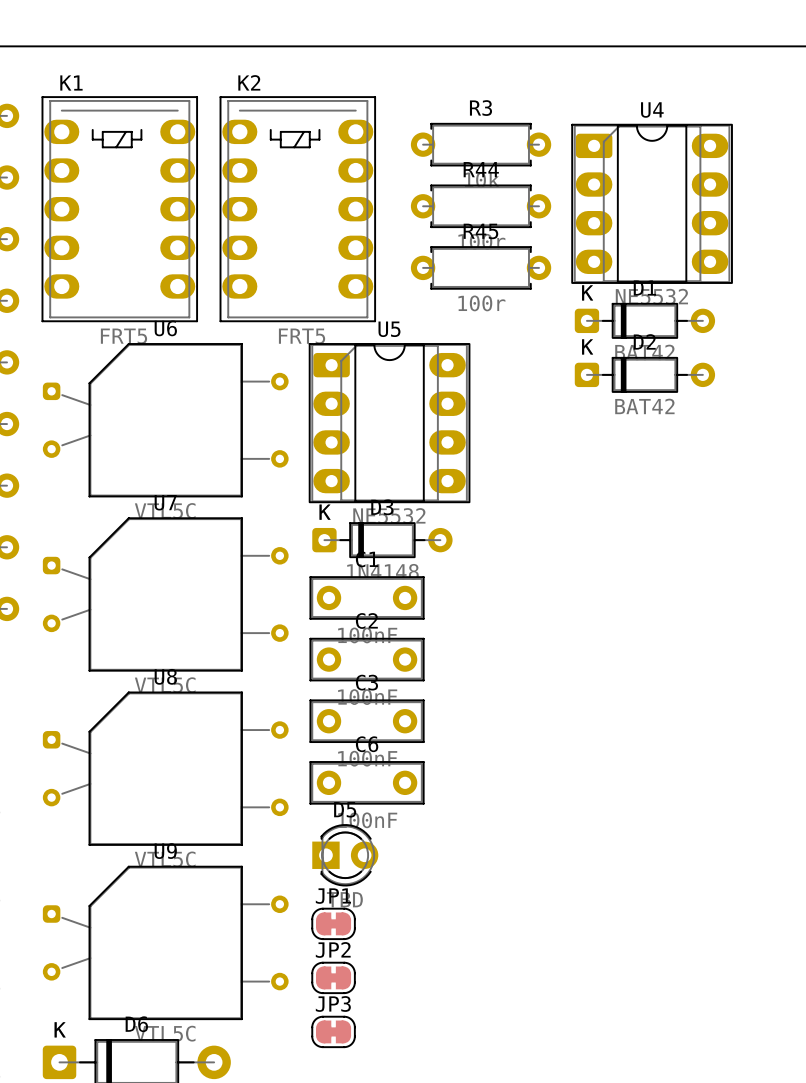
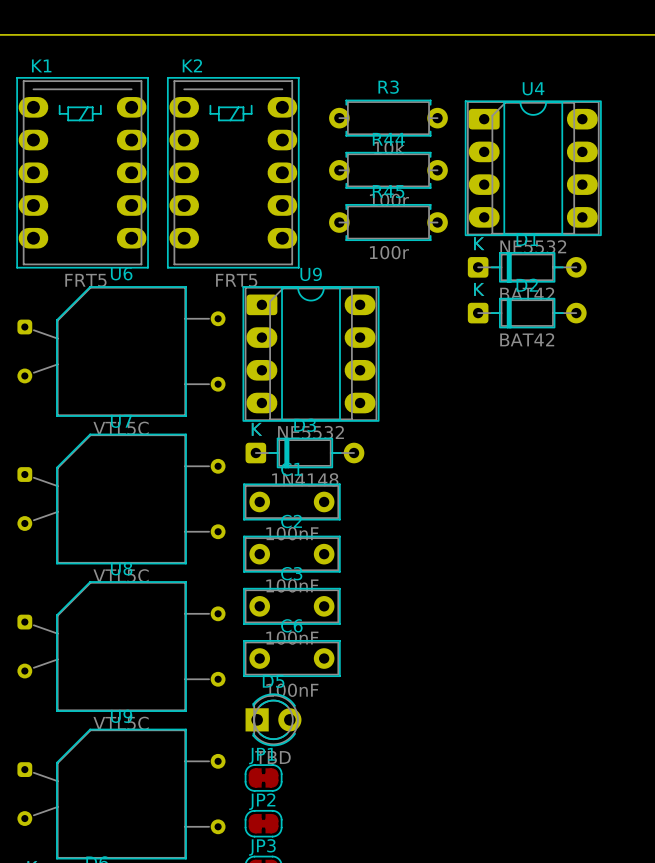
U5 name: U5 (389, 329) -> U9 (311, 274)

